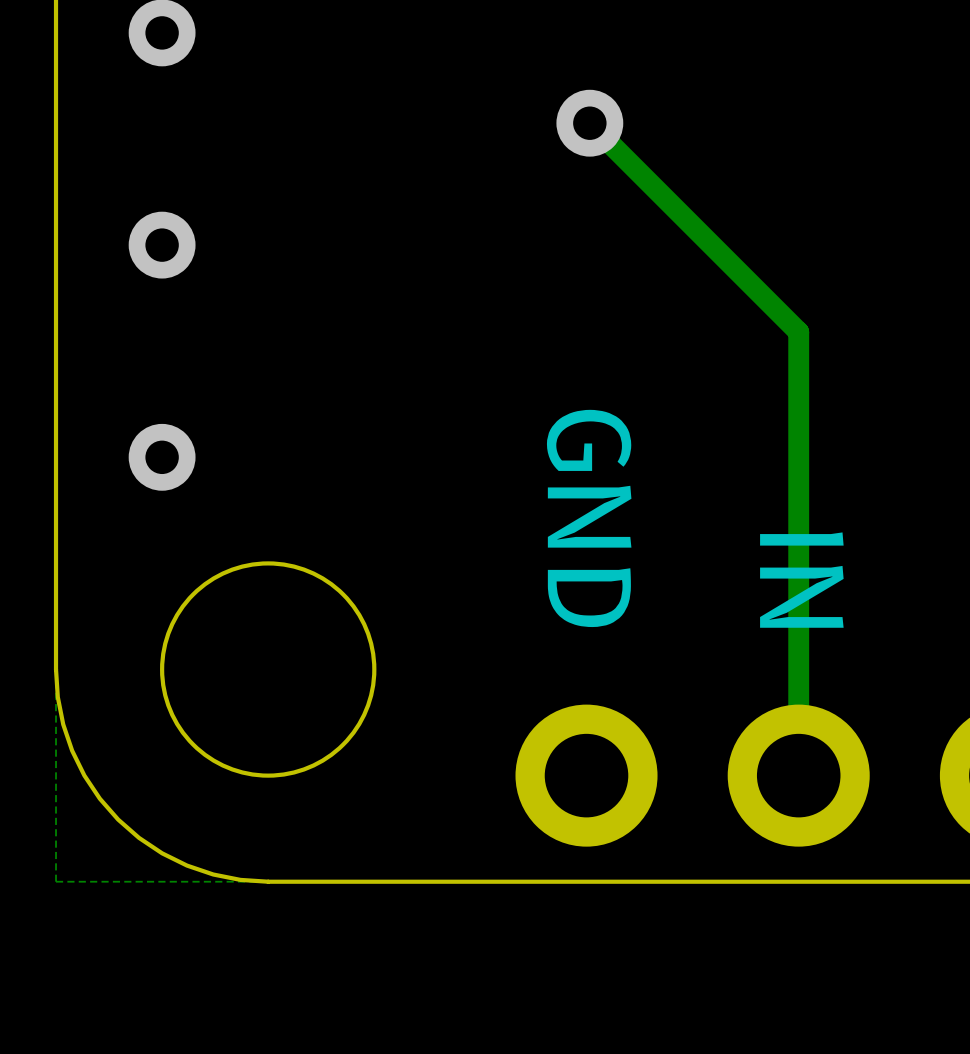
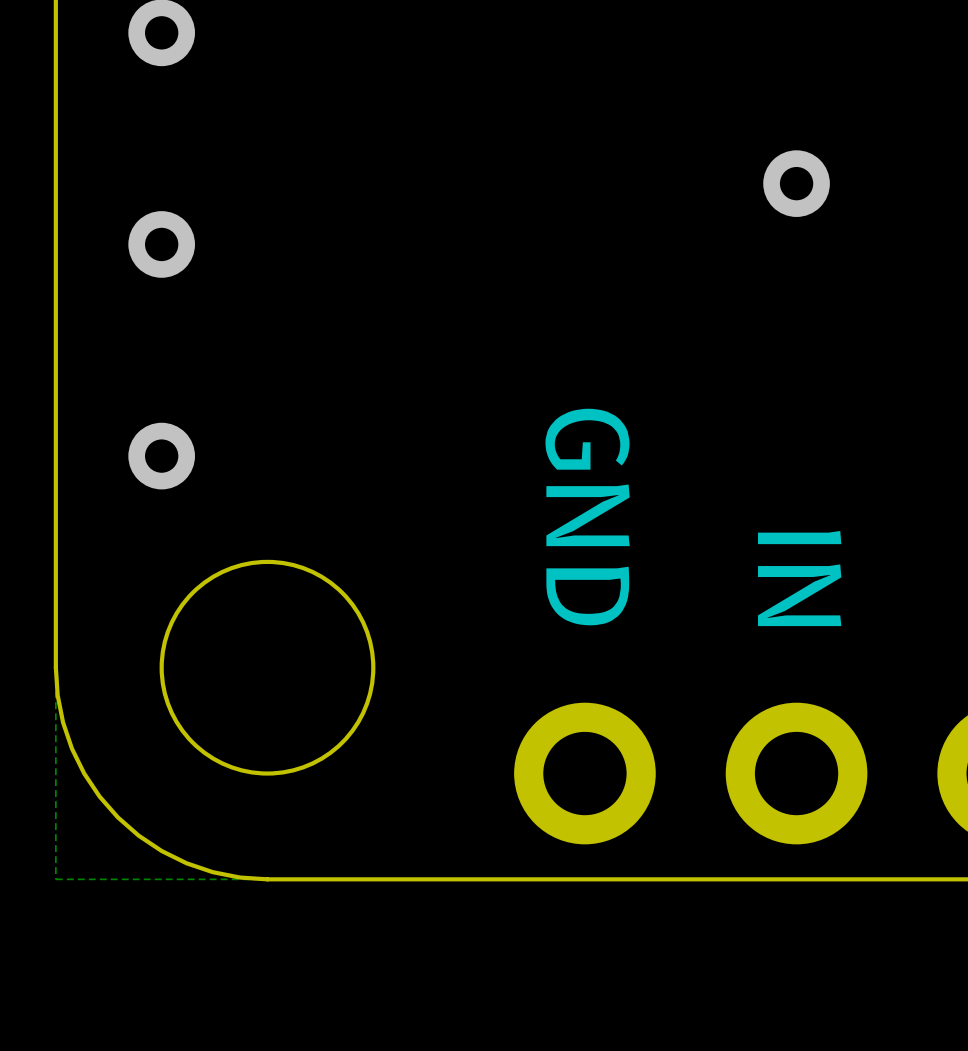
track: (589, 123) (798, 332) (798, 775) -> none
via: (589, 123) -> none
via: none -> (796, 183)

